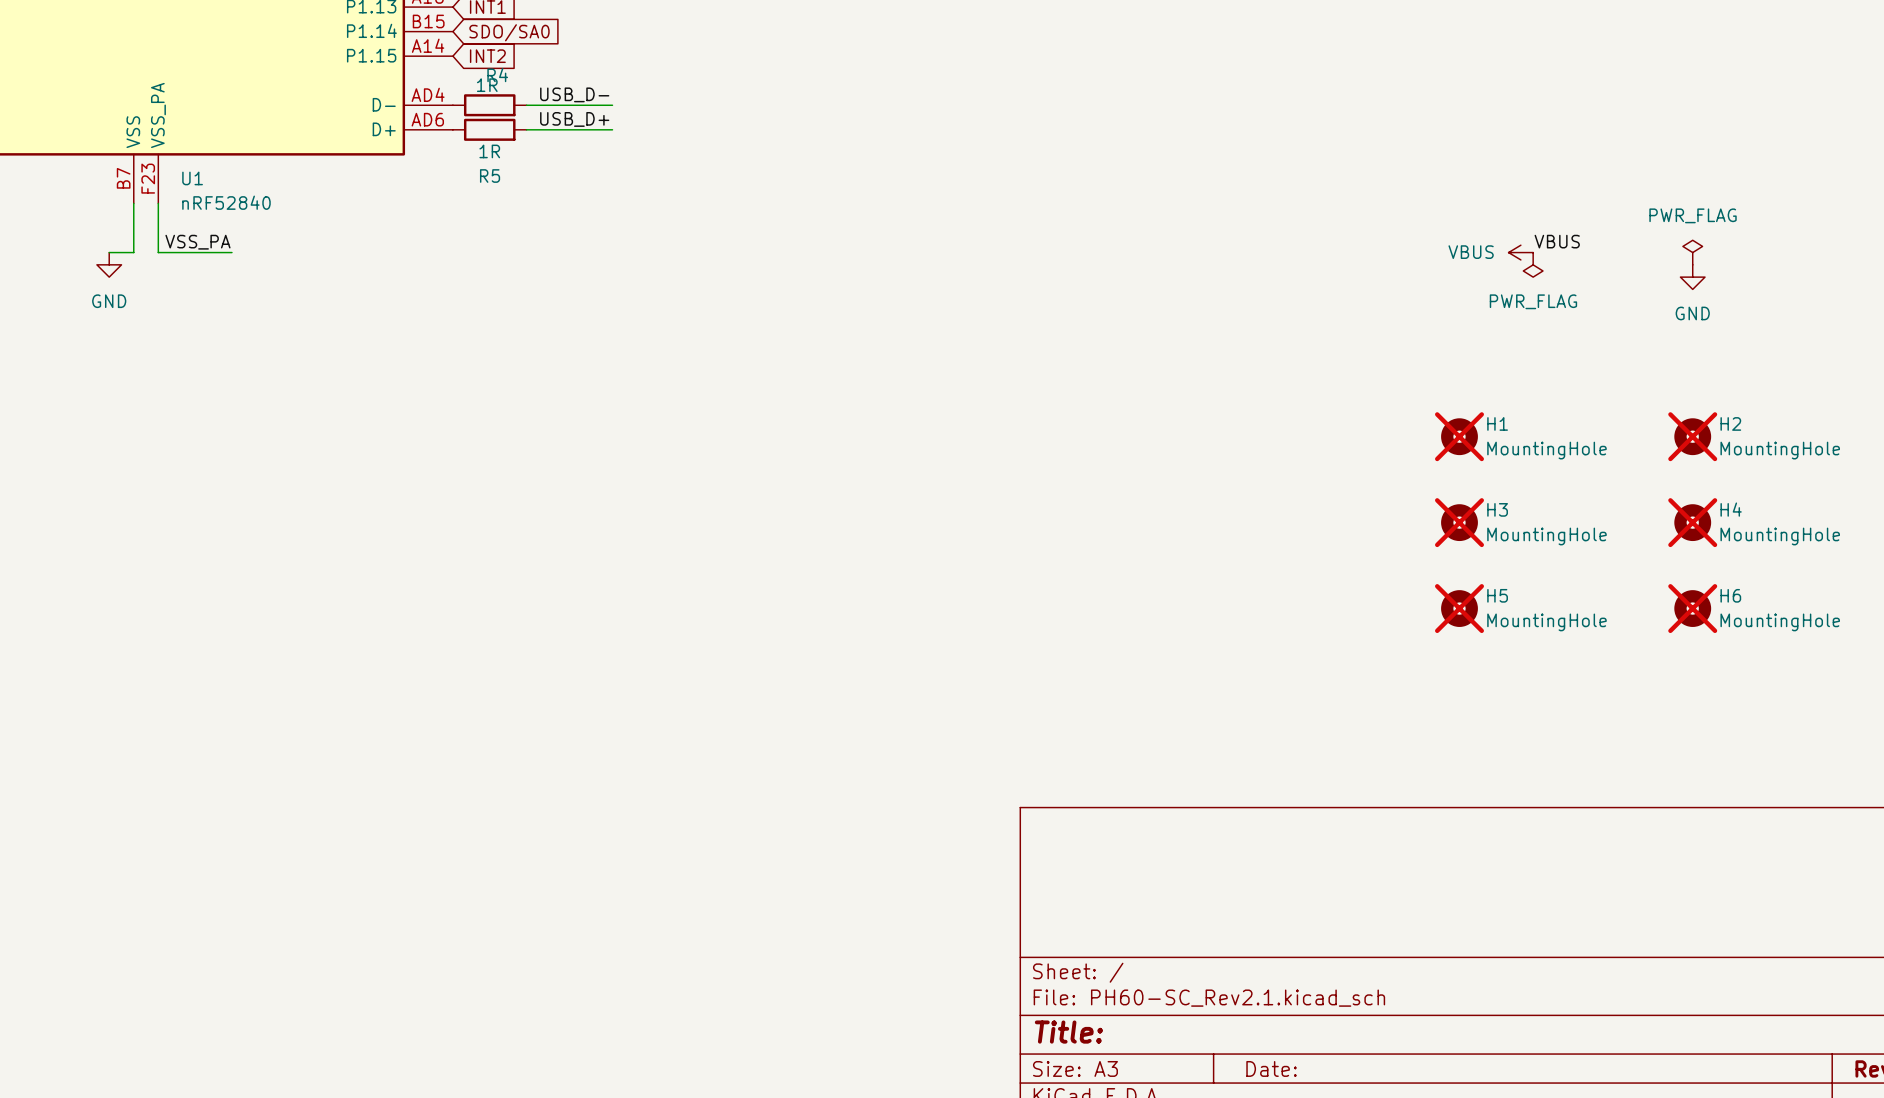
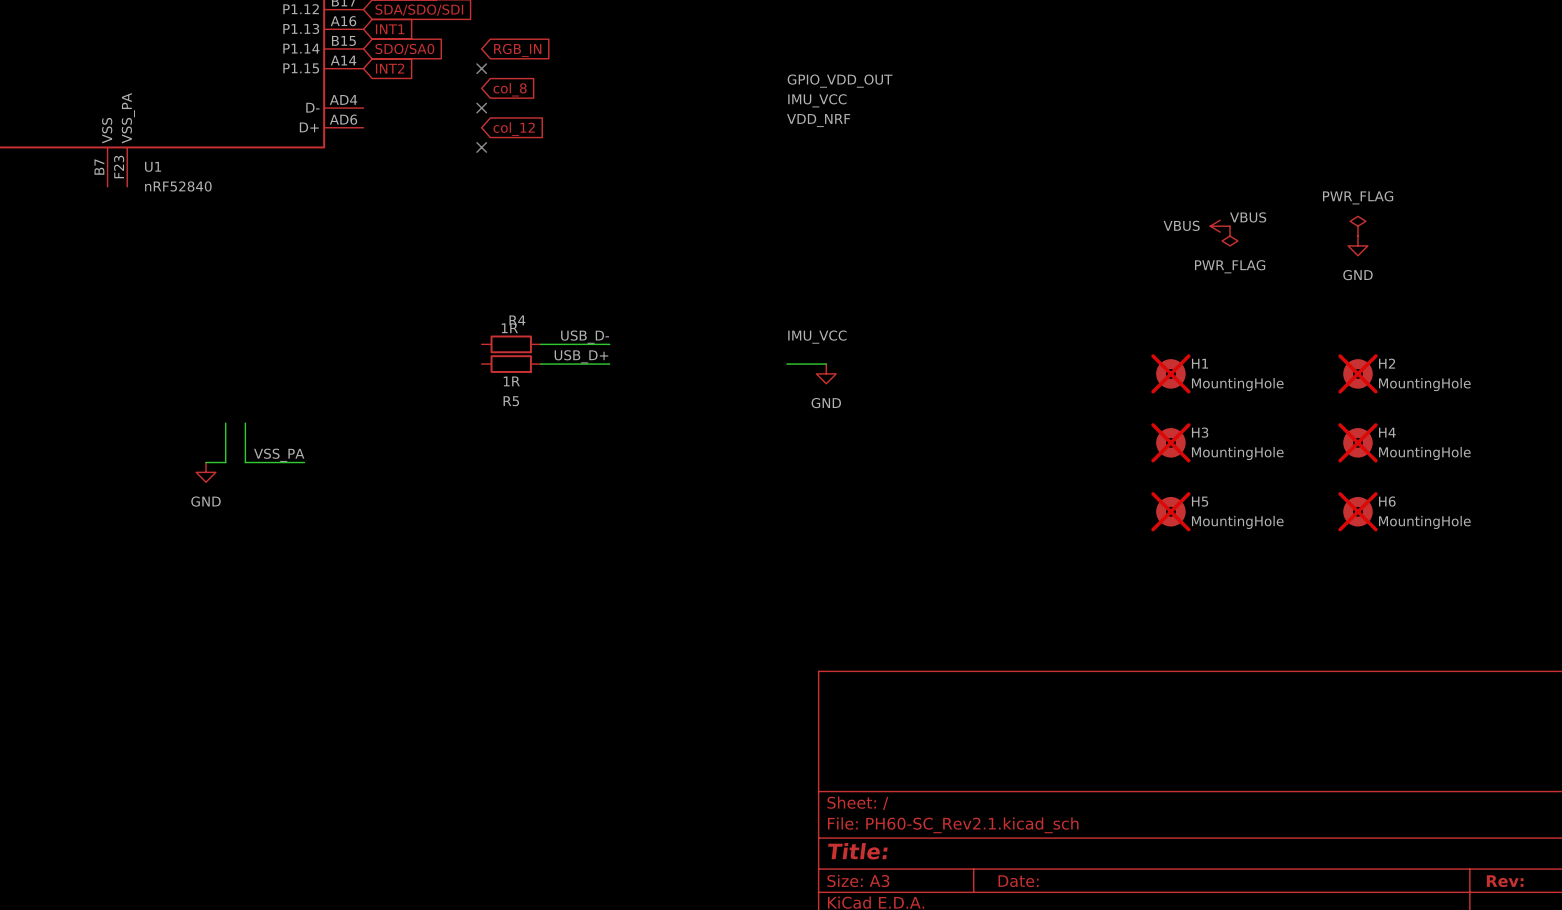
global label: none -> RGB_IN (517, 50)
no-connect mark: none -> (481, 68)
label: none -> GPIO_VDD_OUT (840, 81)
global label: none -> col_8 (510, 89)
label: USB_D- (574, 94) -> none
label: none -> IMU_VCC (817, 100)
R4 position: (489, 105) -> (511, 344)
wire: (526, 105) (612, 105) -> none
no-connect mark: none -> (481, 108)
label: USB_D+ (574, 119) -> none
label: none -> VDD_NRF (818, 120)
R5 position: (489, 129) -> (511, 364)
wire: (526, 129) (612, 129) -> none
global label: none -> col_12 (514, 129)
no-connect mark: none -> (481, 147)
wire: (133, 203) (133, 252) (109, 252) -> none
wire: (158, 203) (158, 252) (231, 252) -> none
label: VSS_PA (197, 242) -> none
power symbol: GND (109, 264) -> none
label: none -> USB_D- (585, 337)
label: none -> IMU_VCC (817, 337)
wire: none -> (540, 344) (609, 344)
label: none -> USB_D+ (581, 356)
wire: none -> (540, 364) (609, 364)
wire: none -> (786, 364) (826, 364)
power symbol: none -> GND (826, 373)
wire: none -> (225, 423) (225, 462) (206, 462)
wire: none -> (245, 423) (245, 462) (304, 462)
label: none -> VSS_PA (279, 455)
power symbol: none -> GND (206, 472)

